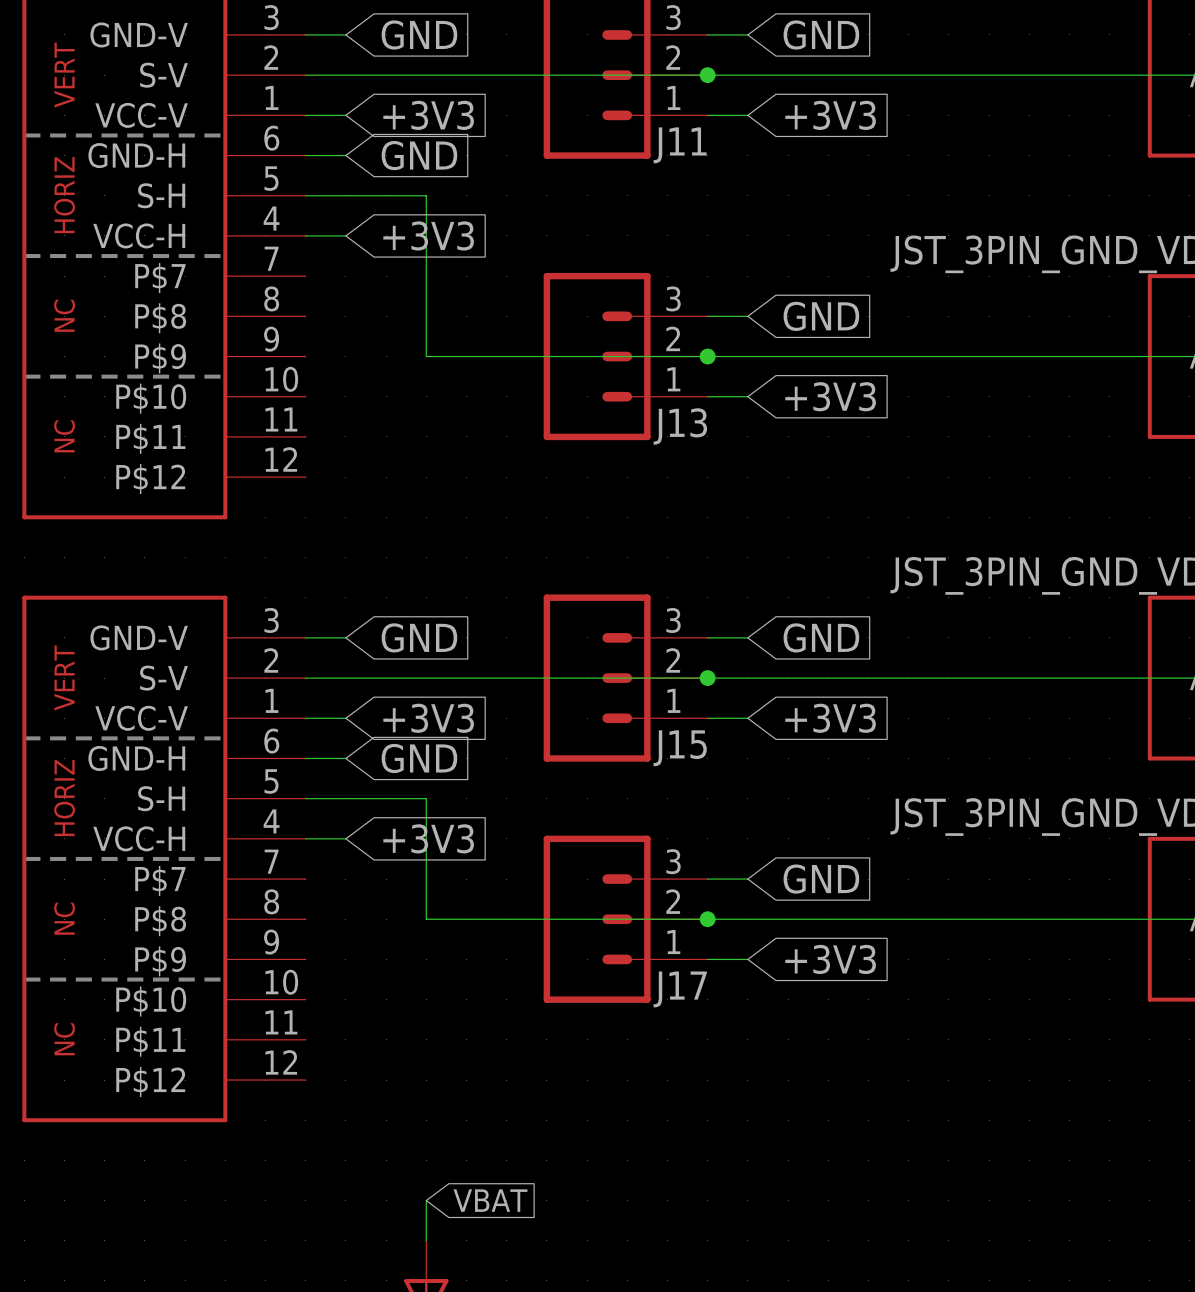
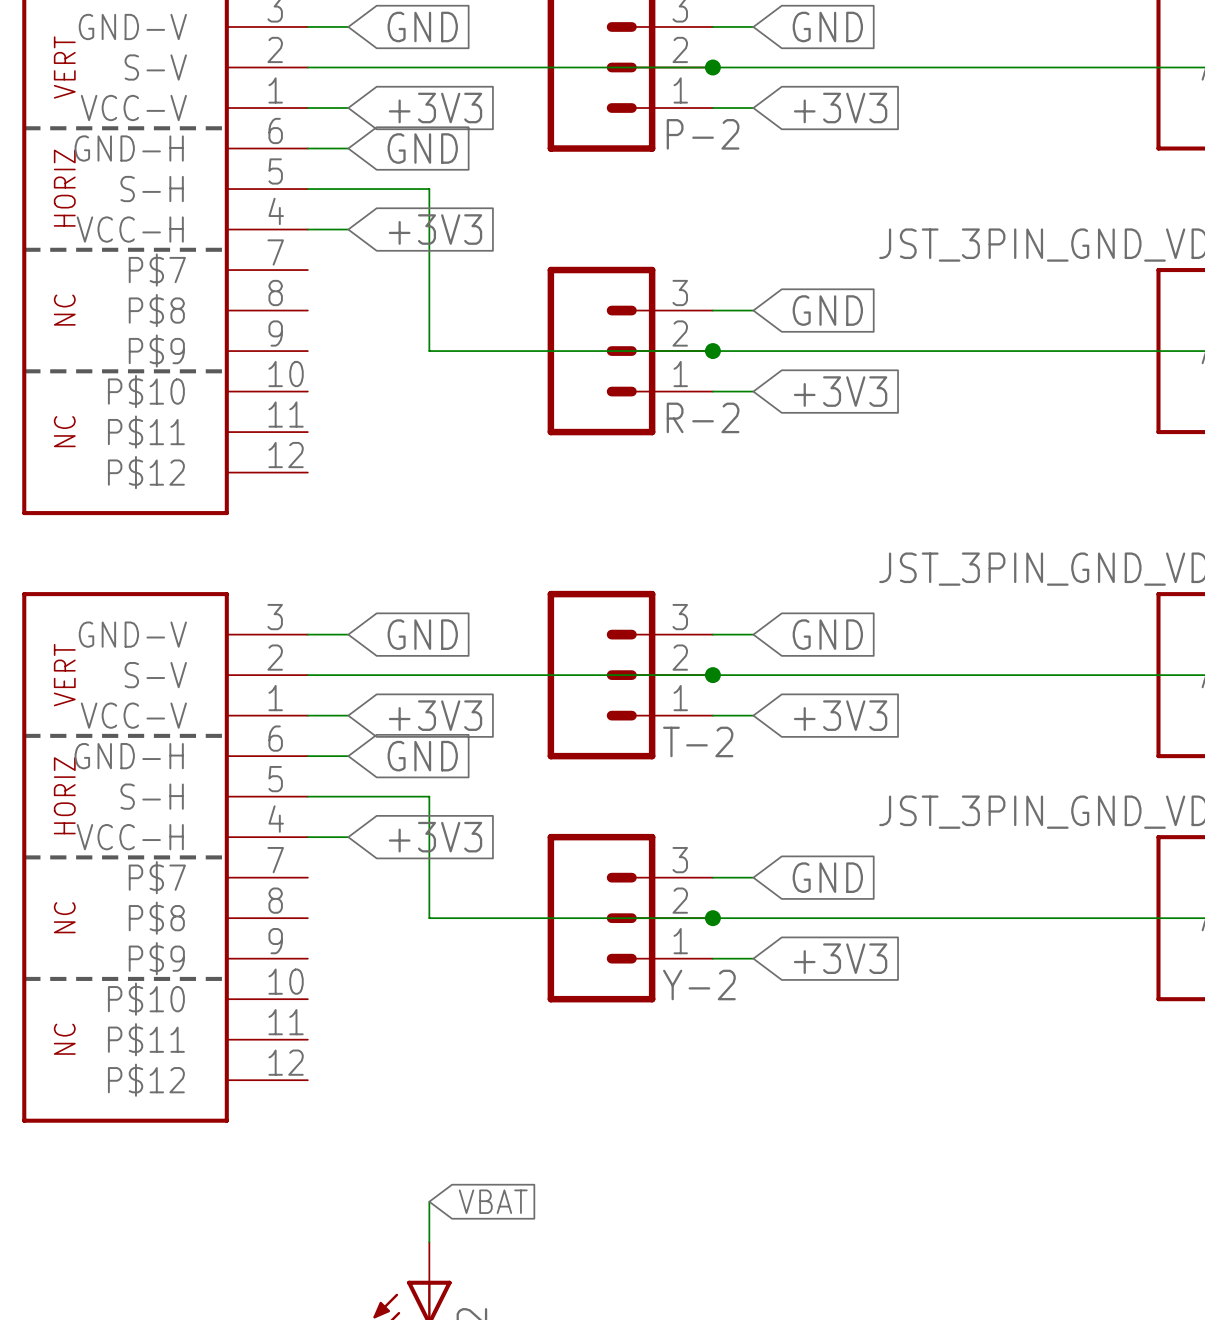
J11 name: J11 (680, 145) -> P-2 (703, 134)
J13 name: J13 (680, 426) -> R-2 (703, 417)
J15 name: J15 (680, 748) -> T-2 (698, 741)
J17 name: J17 (680, 989) -> Y-2 (699, 985)

